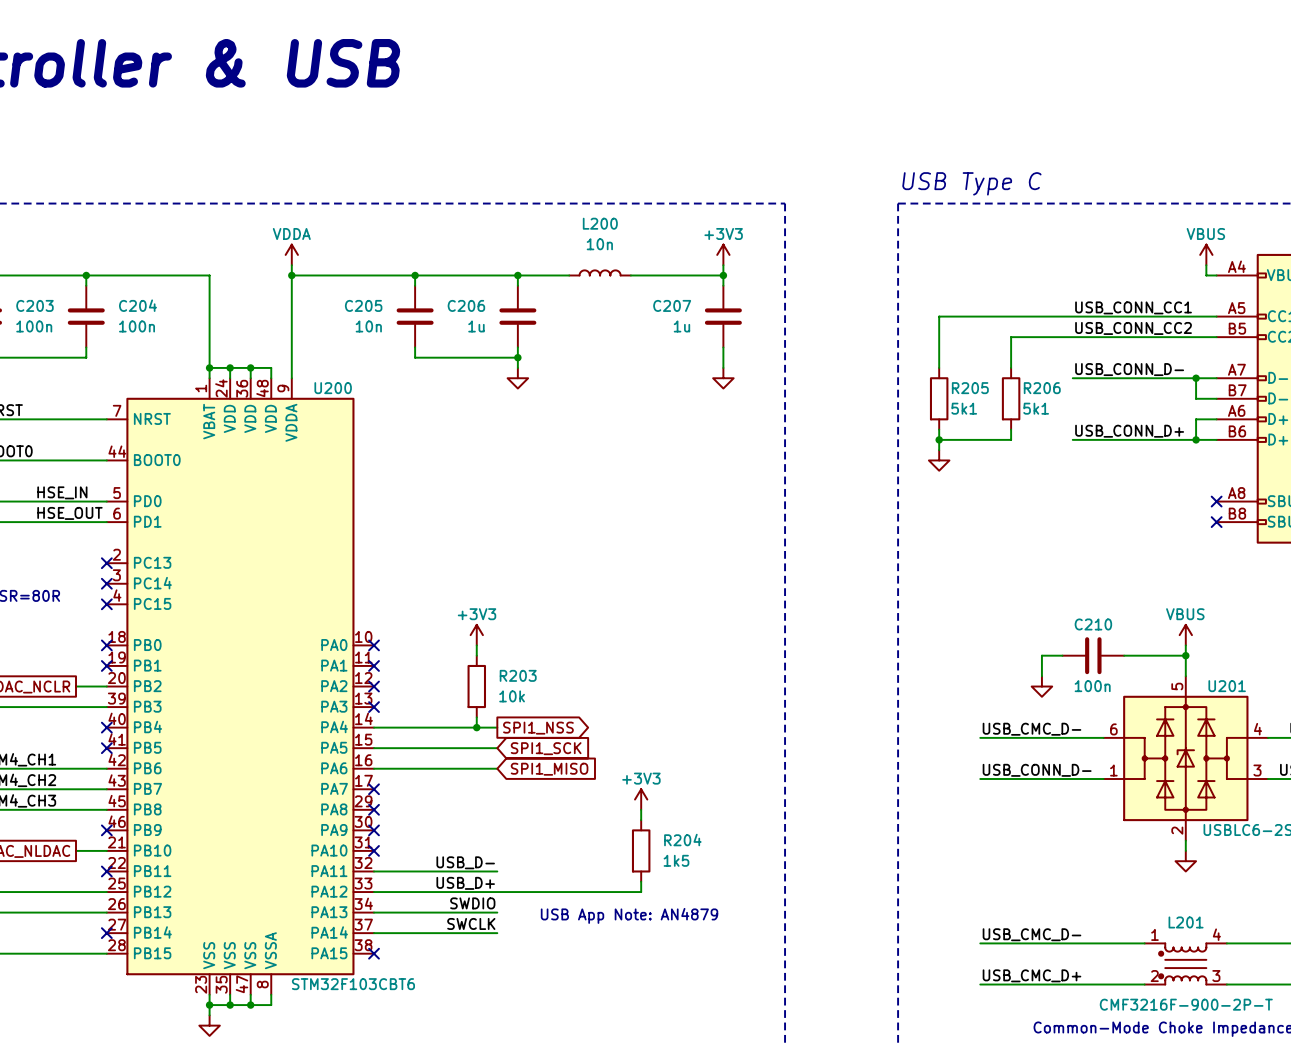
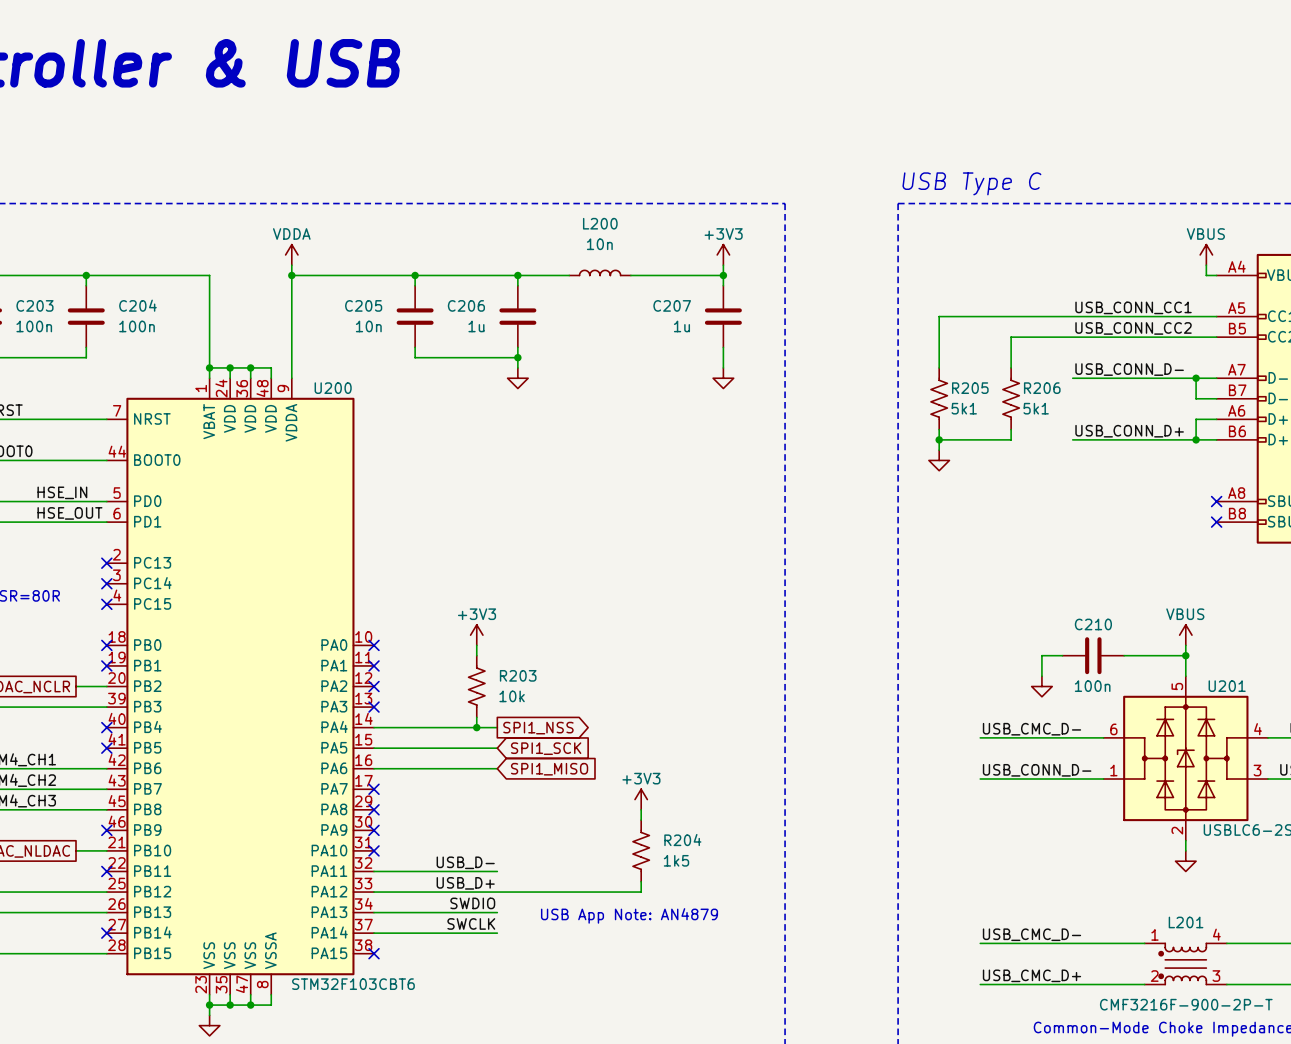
R205 symbol: [929, 367, 949, 430] -> [930, 367, 948, 430]
R206 symbol: [1001, 367, 1021, 430] -> [1002, 367, 1020, 430]
R203 symbol: [467, 655, 487, 718] -> [468, 655, 485, 718]
R204 symbol: [631, 820, 651, 882] -> [632, 820, 650, 882]

